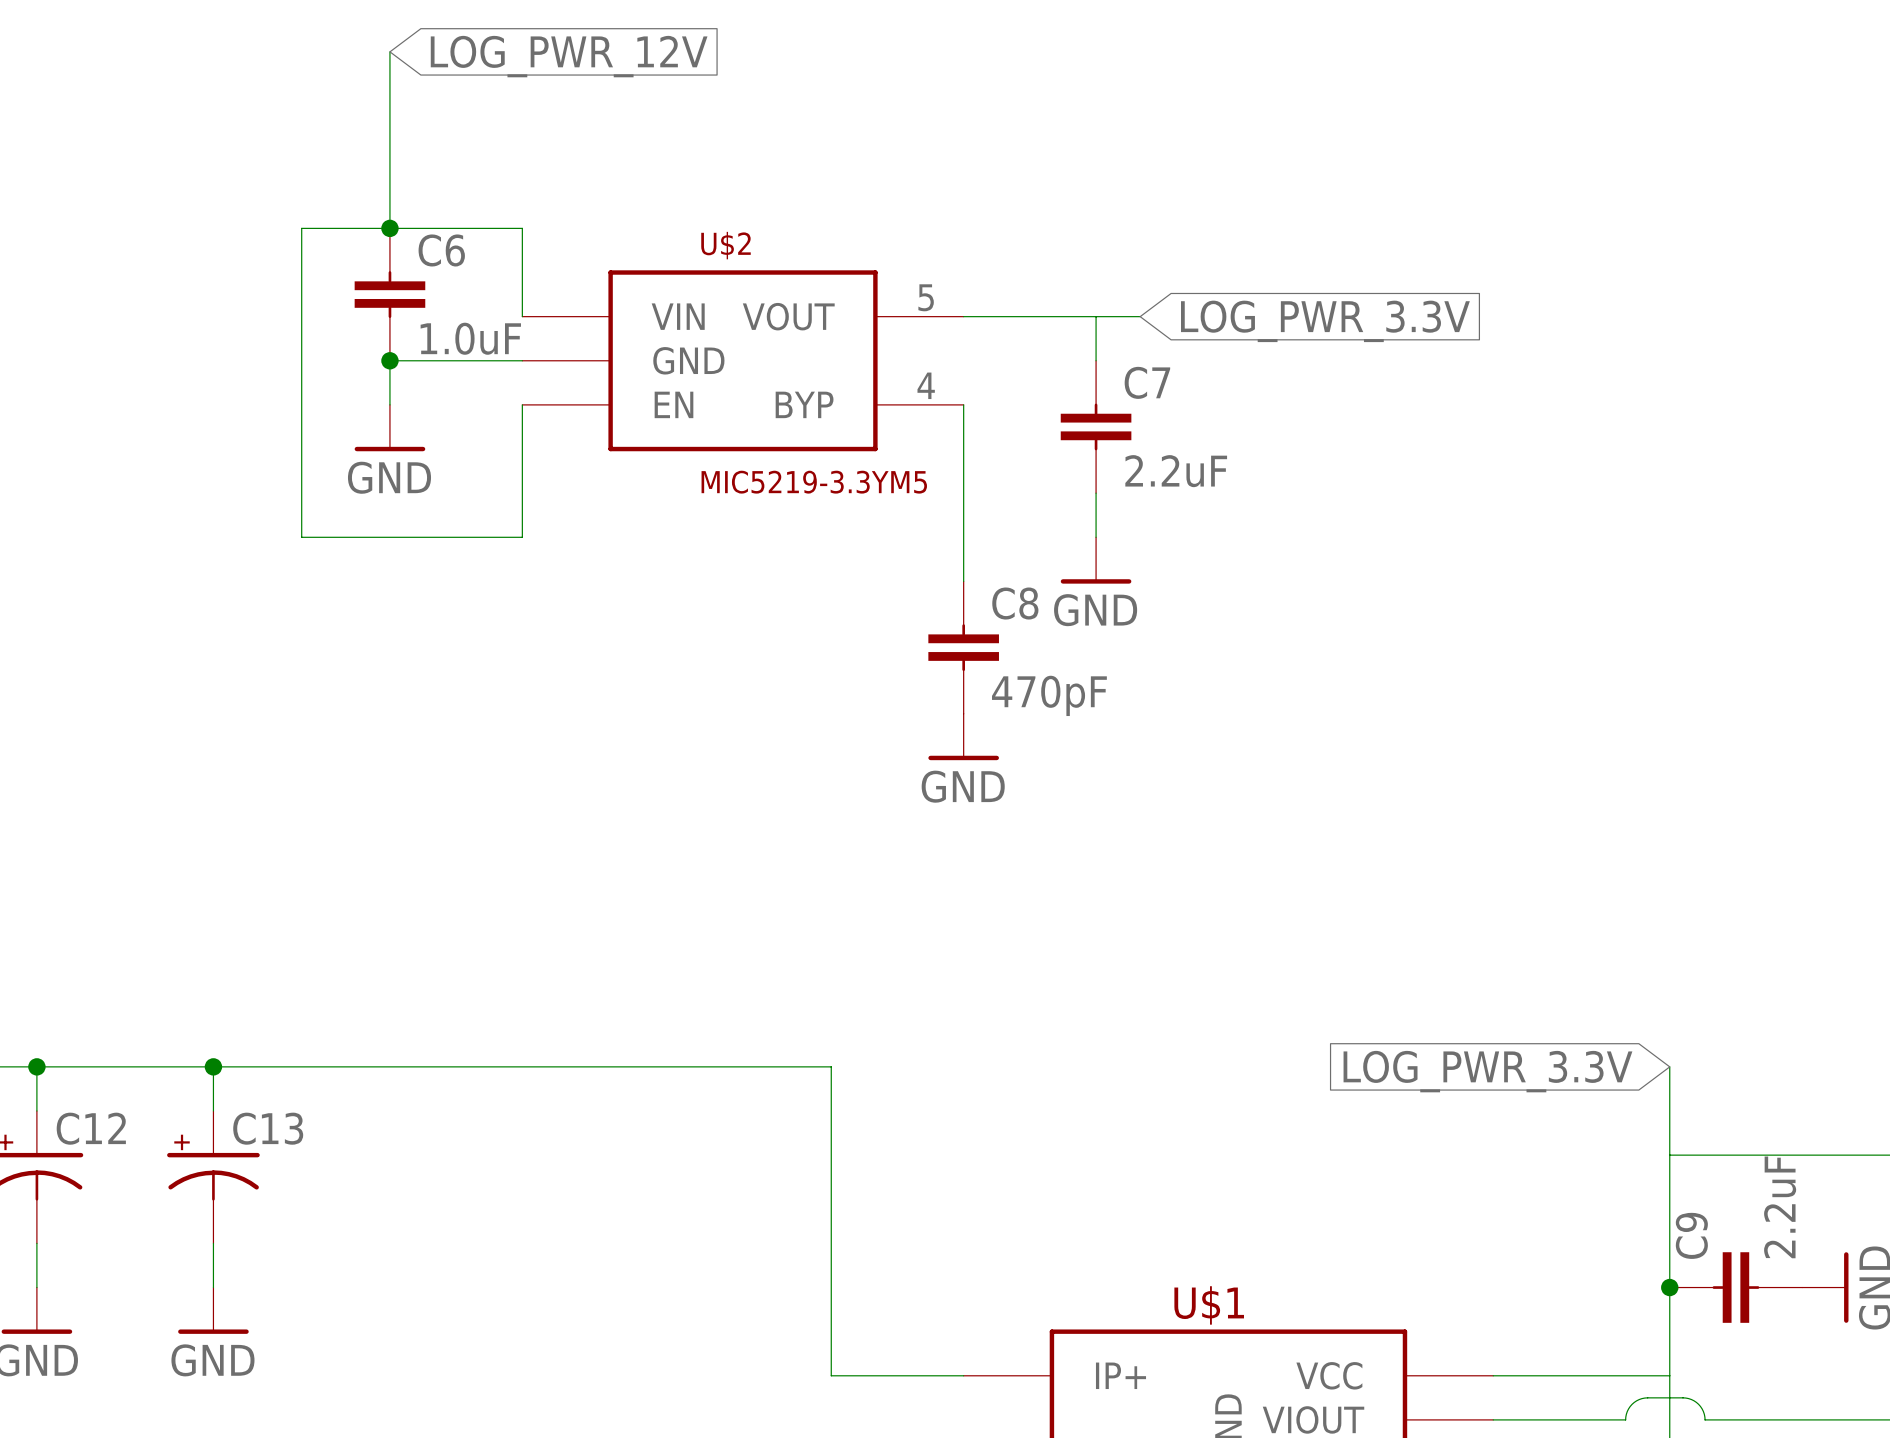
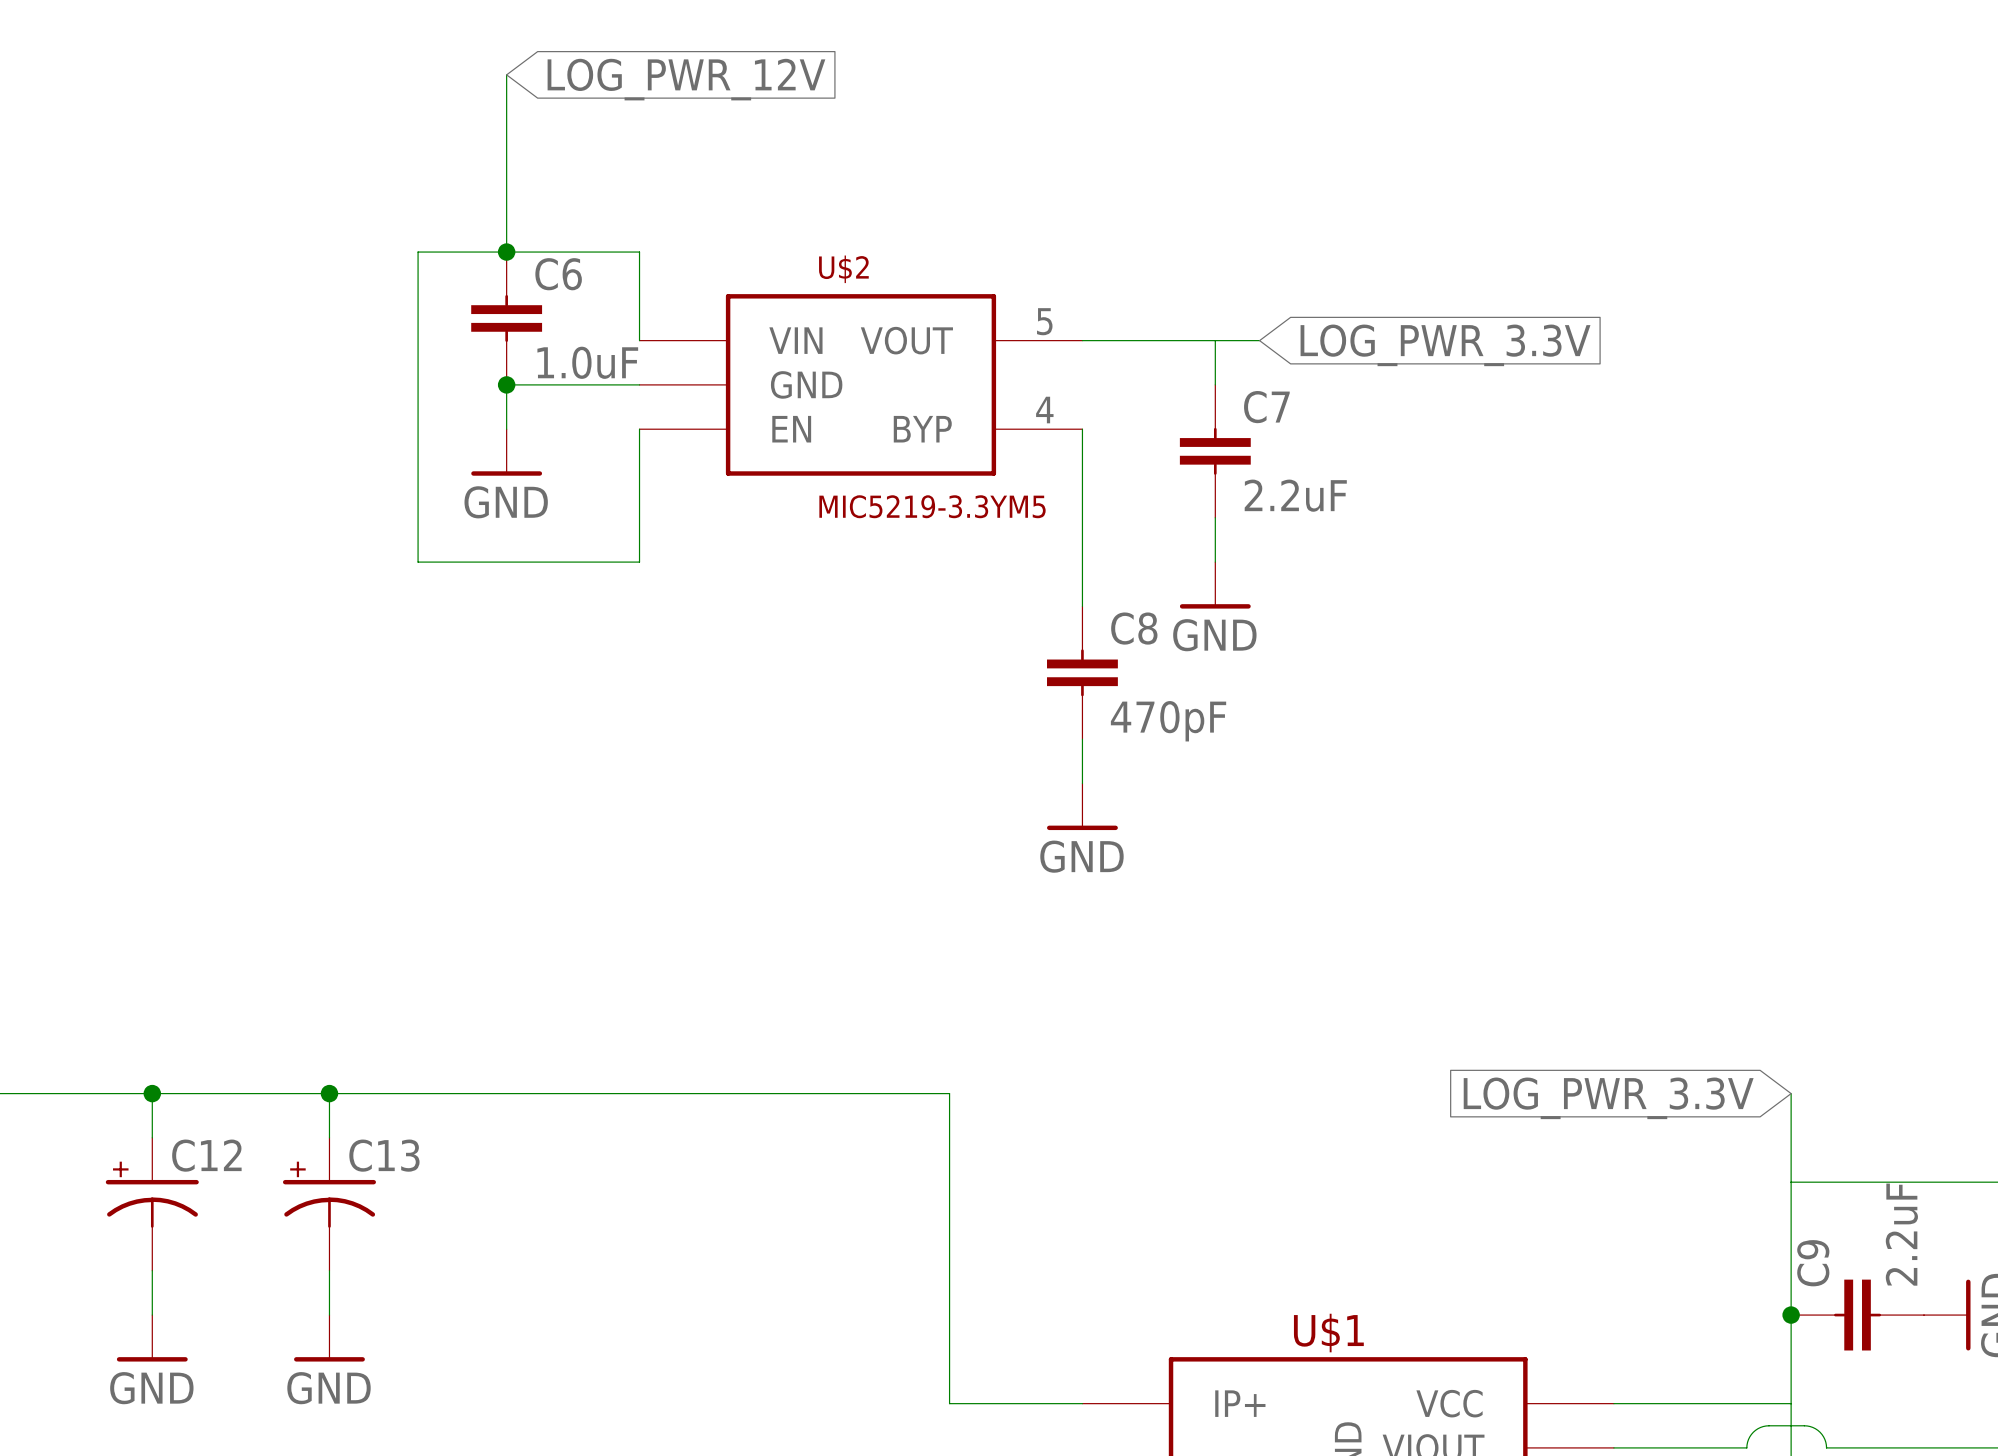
power symbol position: GND (963, 736) -> GND (1082, 806)

